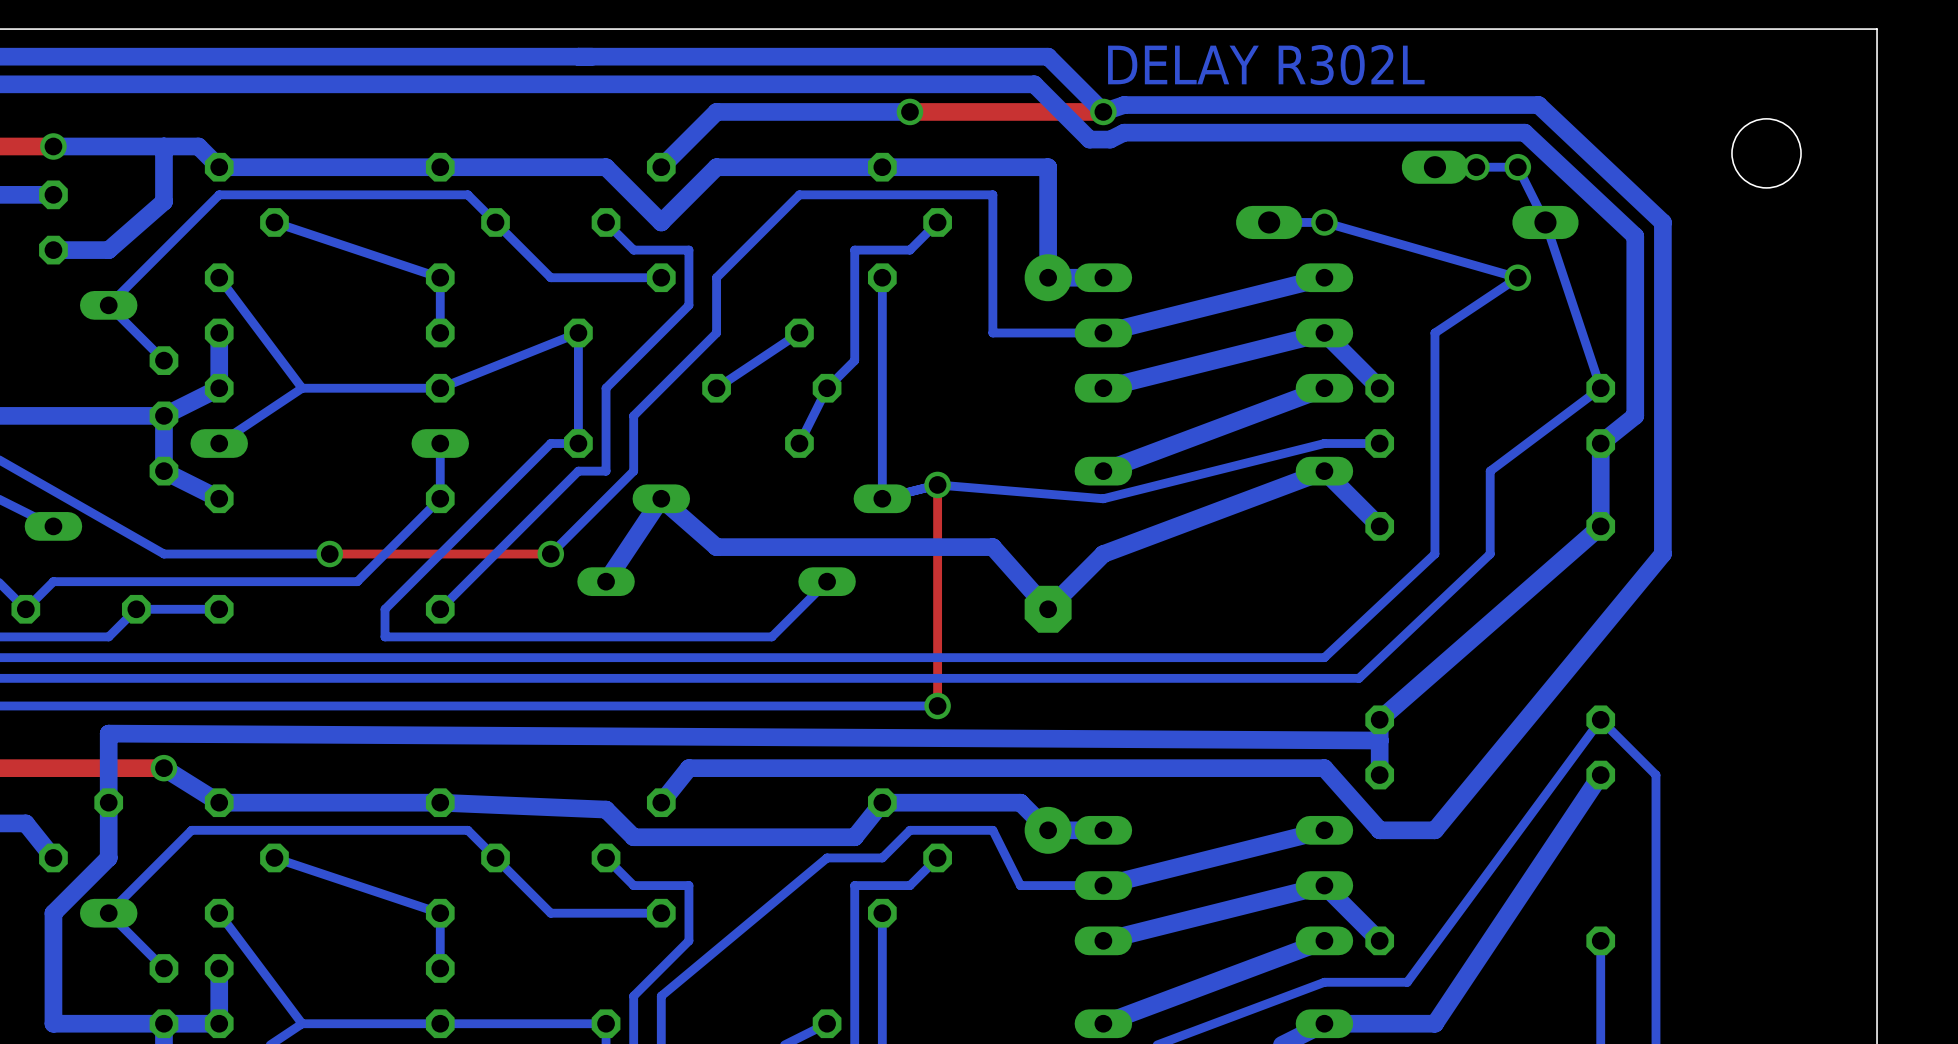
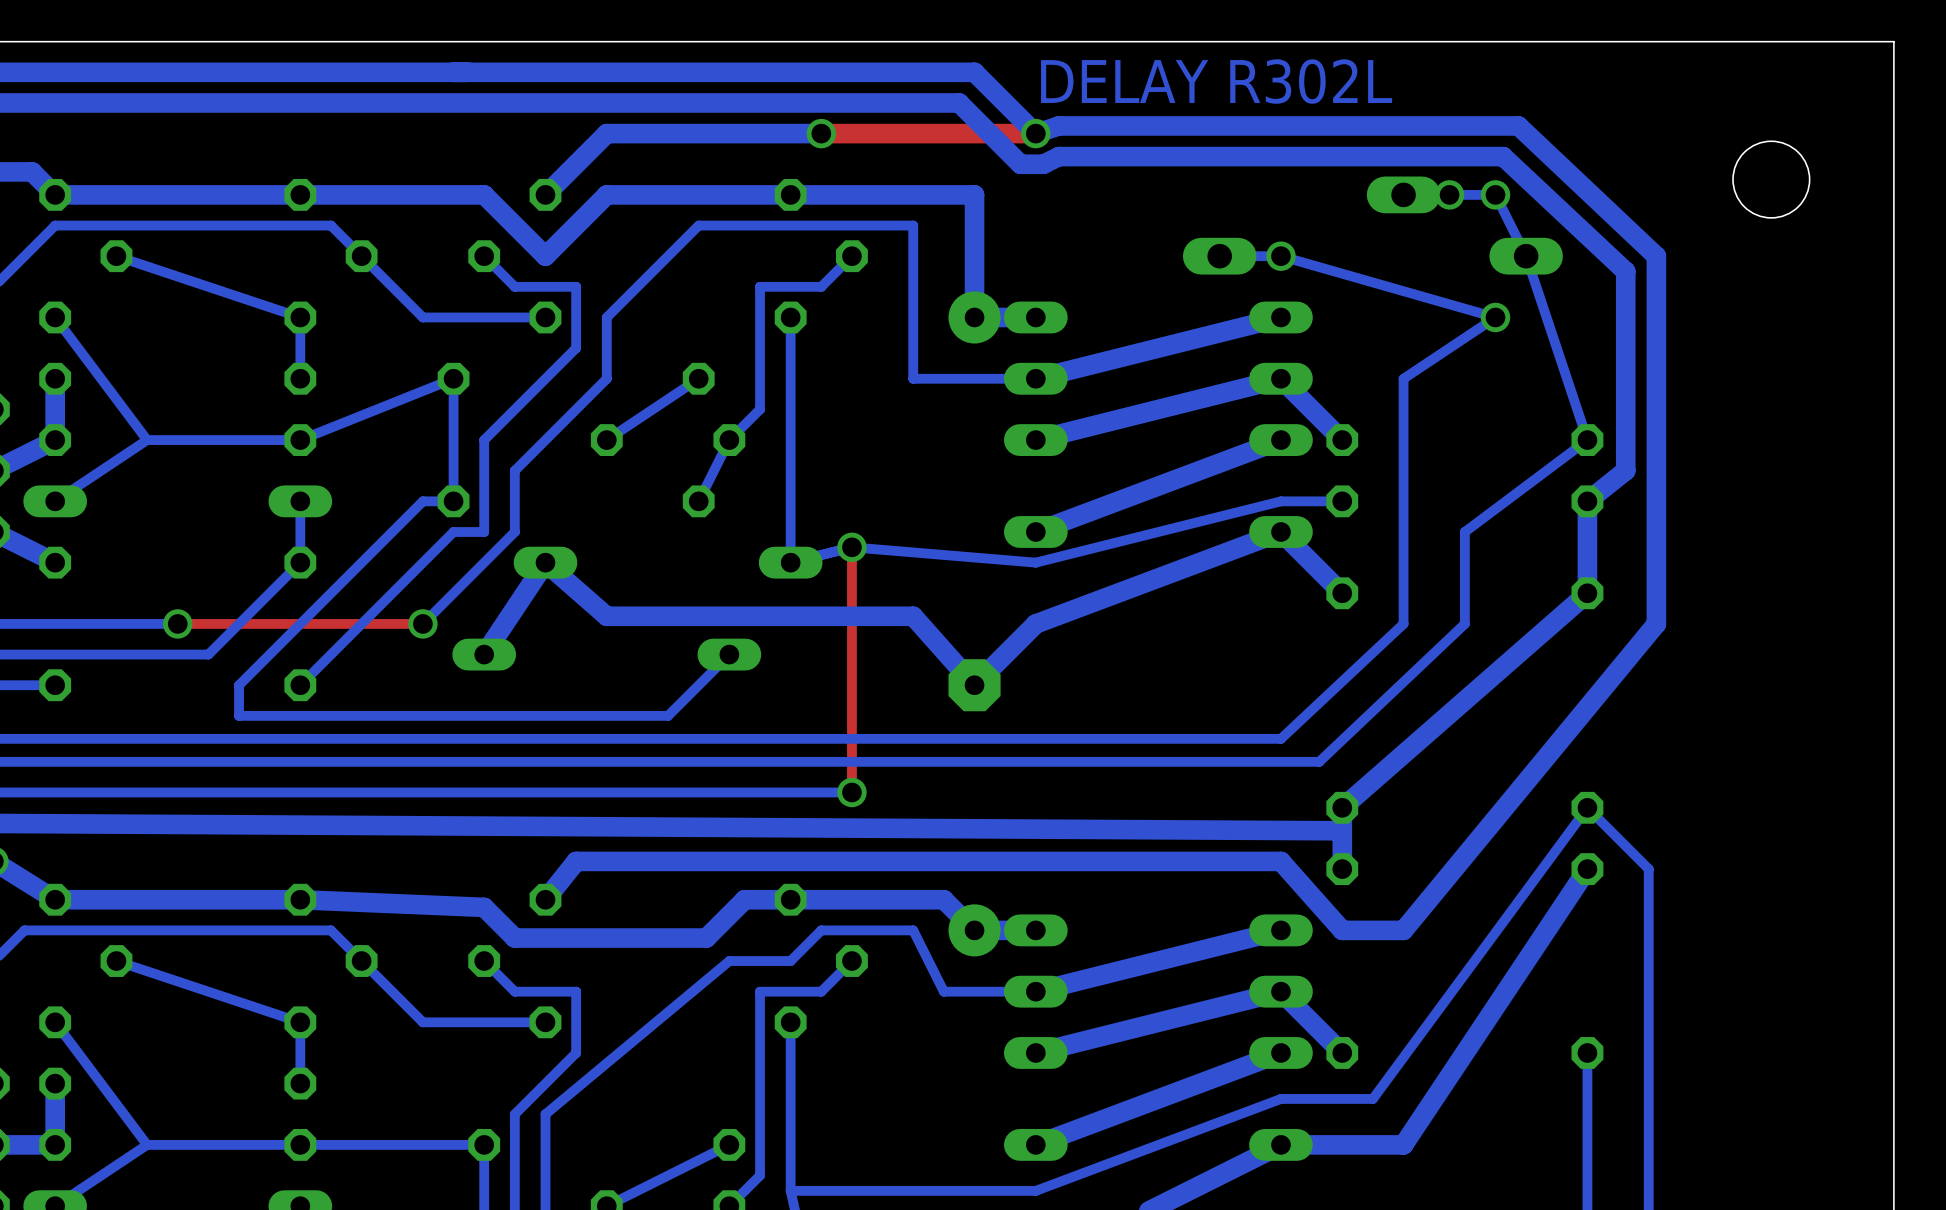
bottom track: (882, 802) (854, 837) (806, 837) -> (790, 899) (744, 899) (706, 938)

